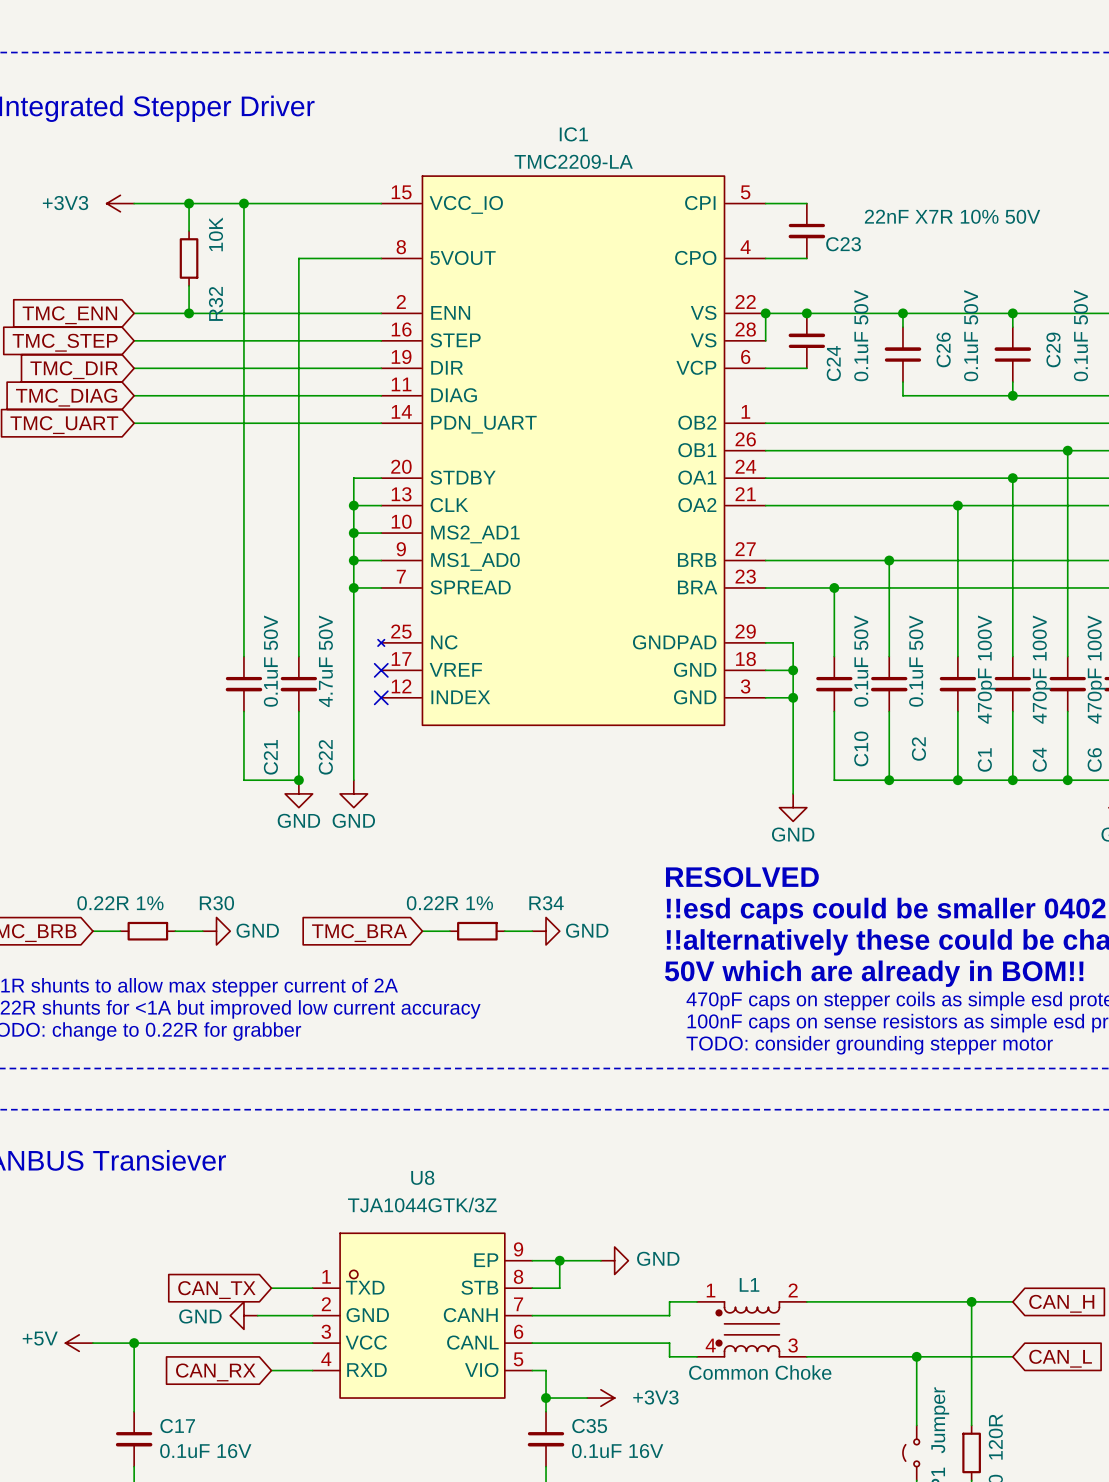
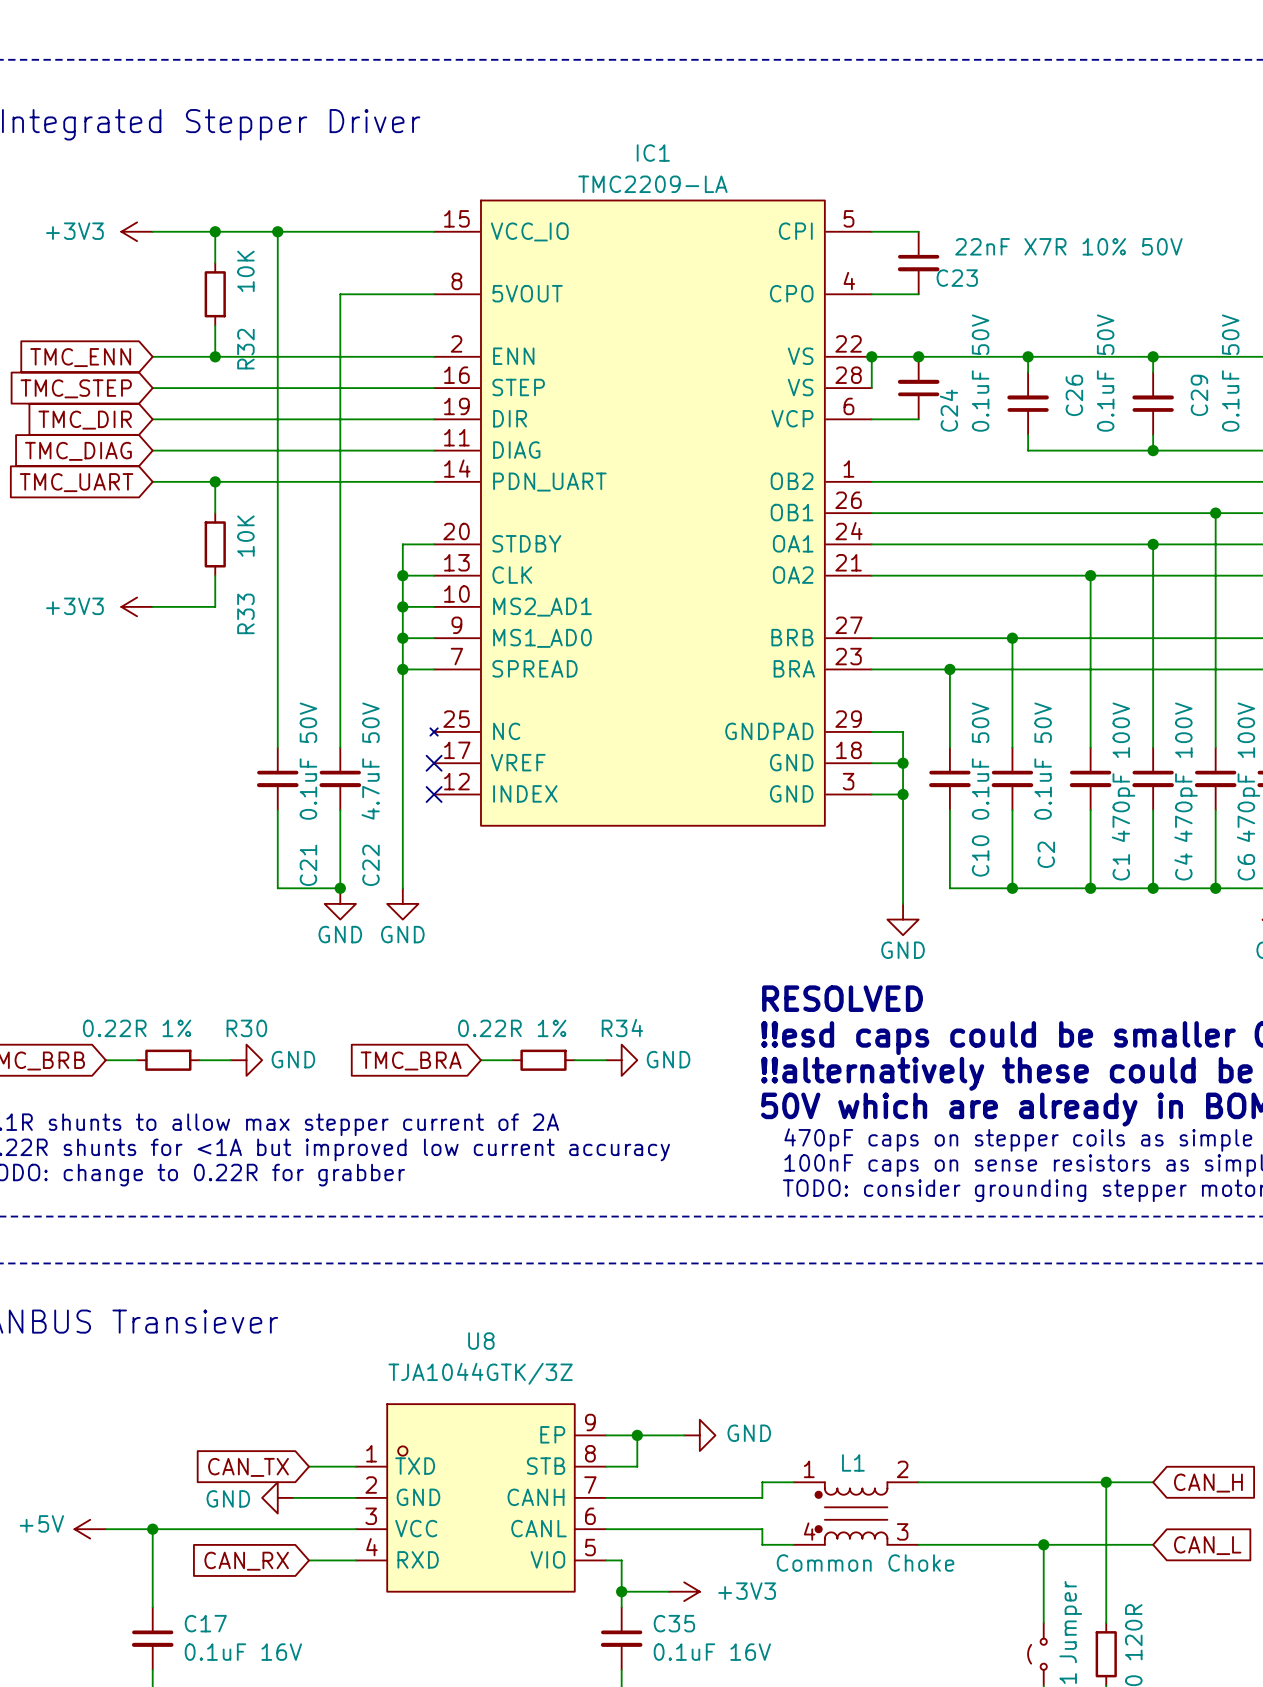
wire: none -> (215, 481) (215, 513)
junction: none -> (215, 481)
R33: none -> 10K (215, 544)
wire: none -> (215, 575) (215, 606) (152, 606)
power symbol: none -> +3V3 (137, 606)

